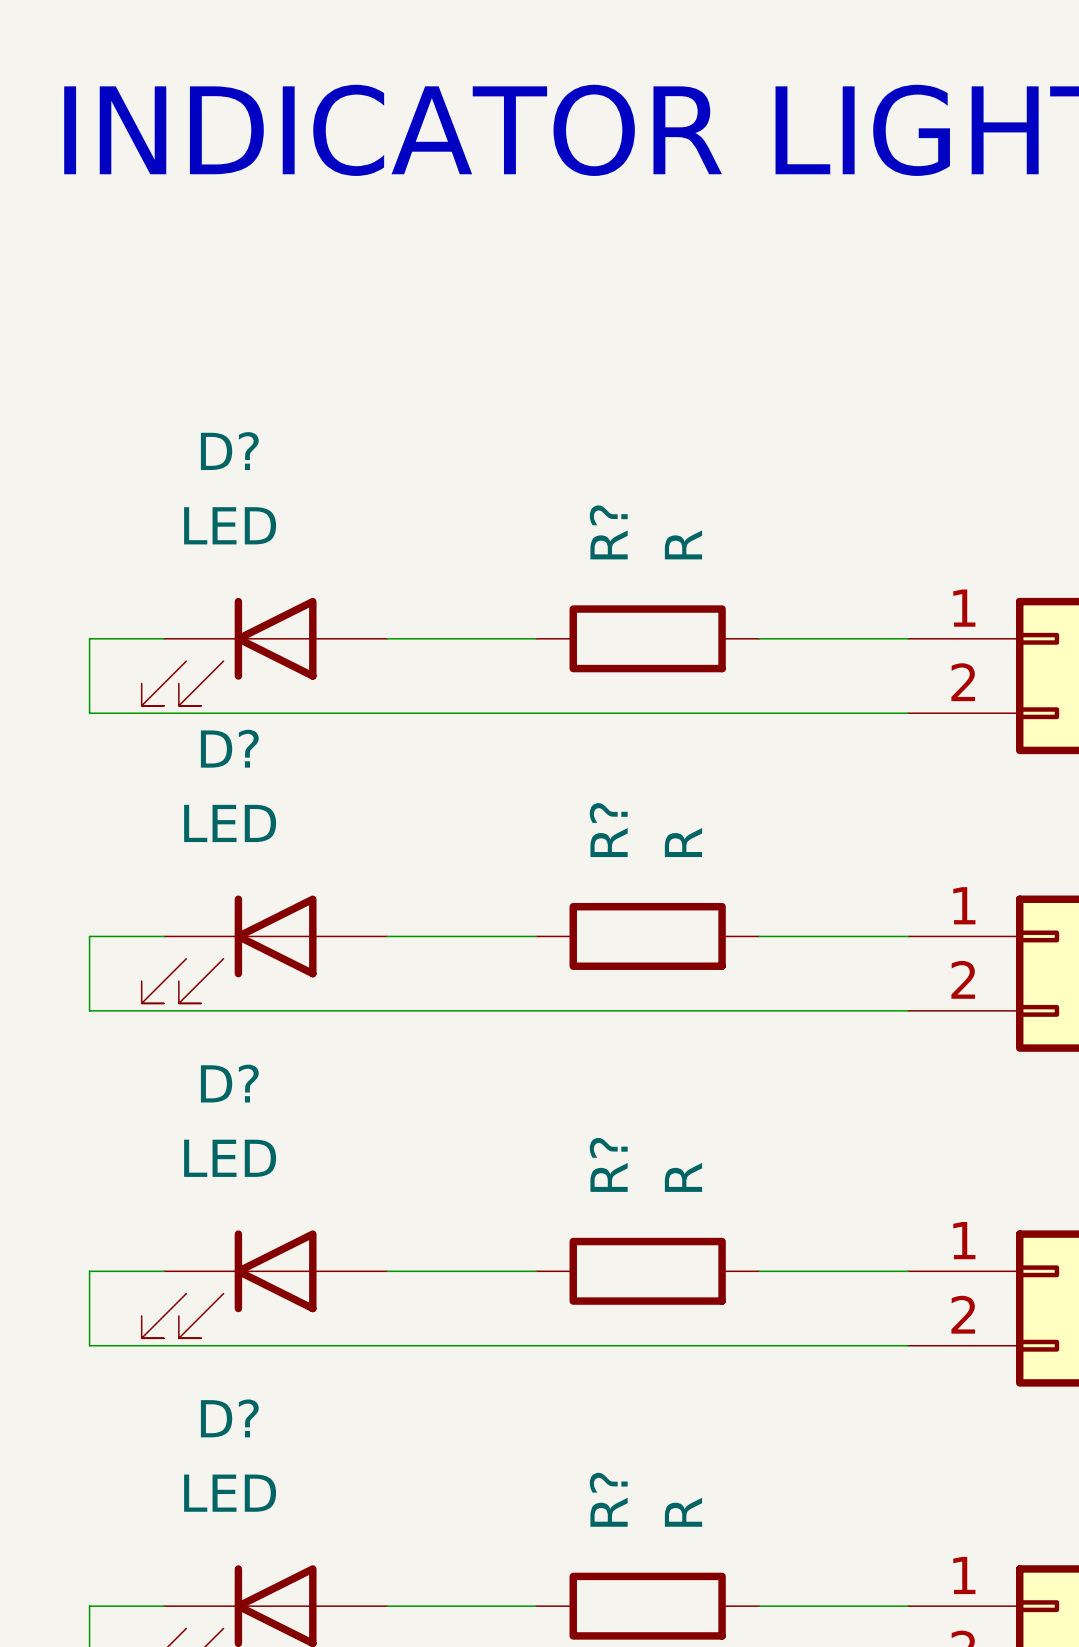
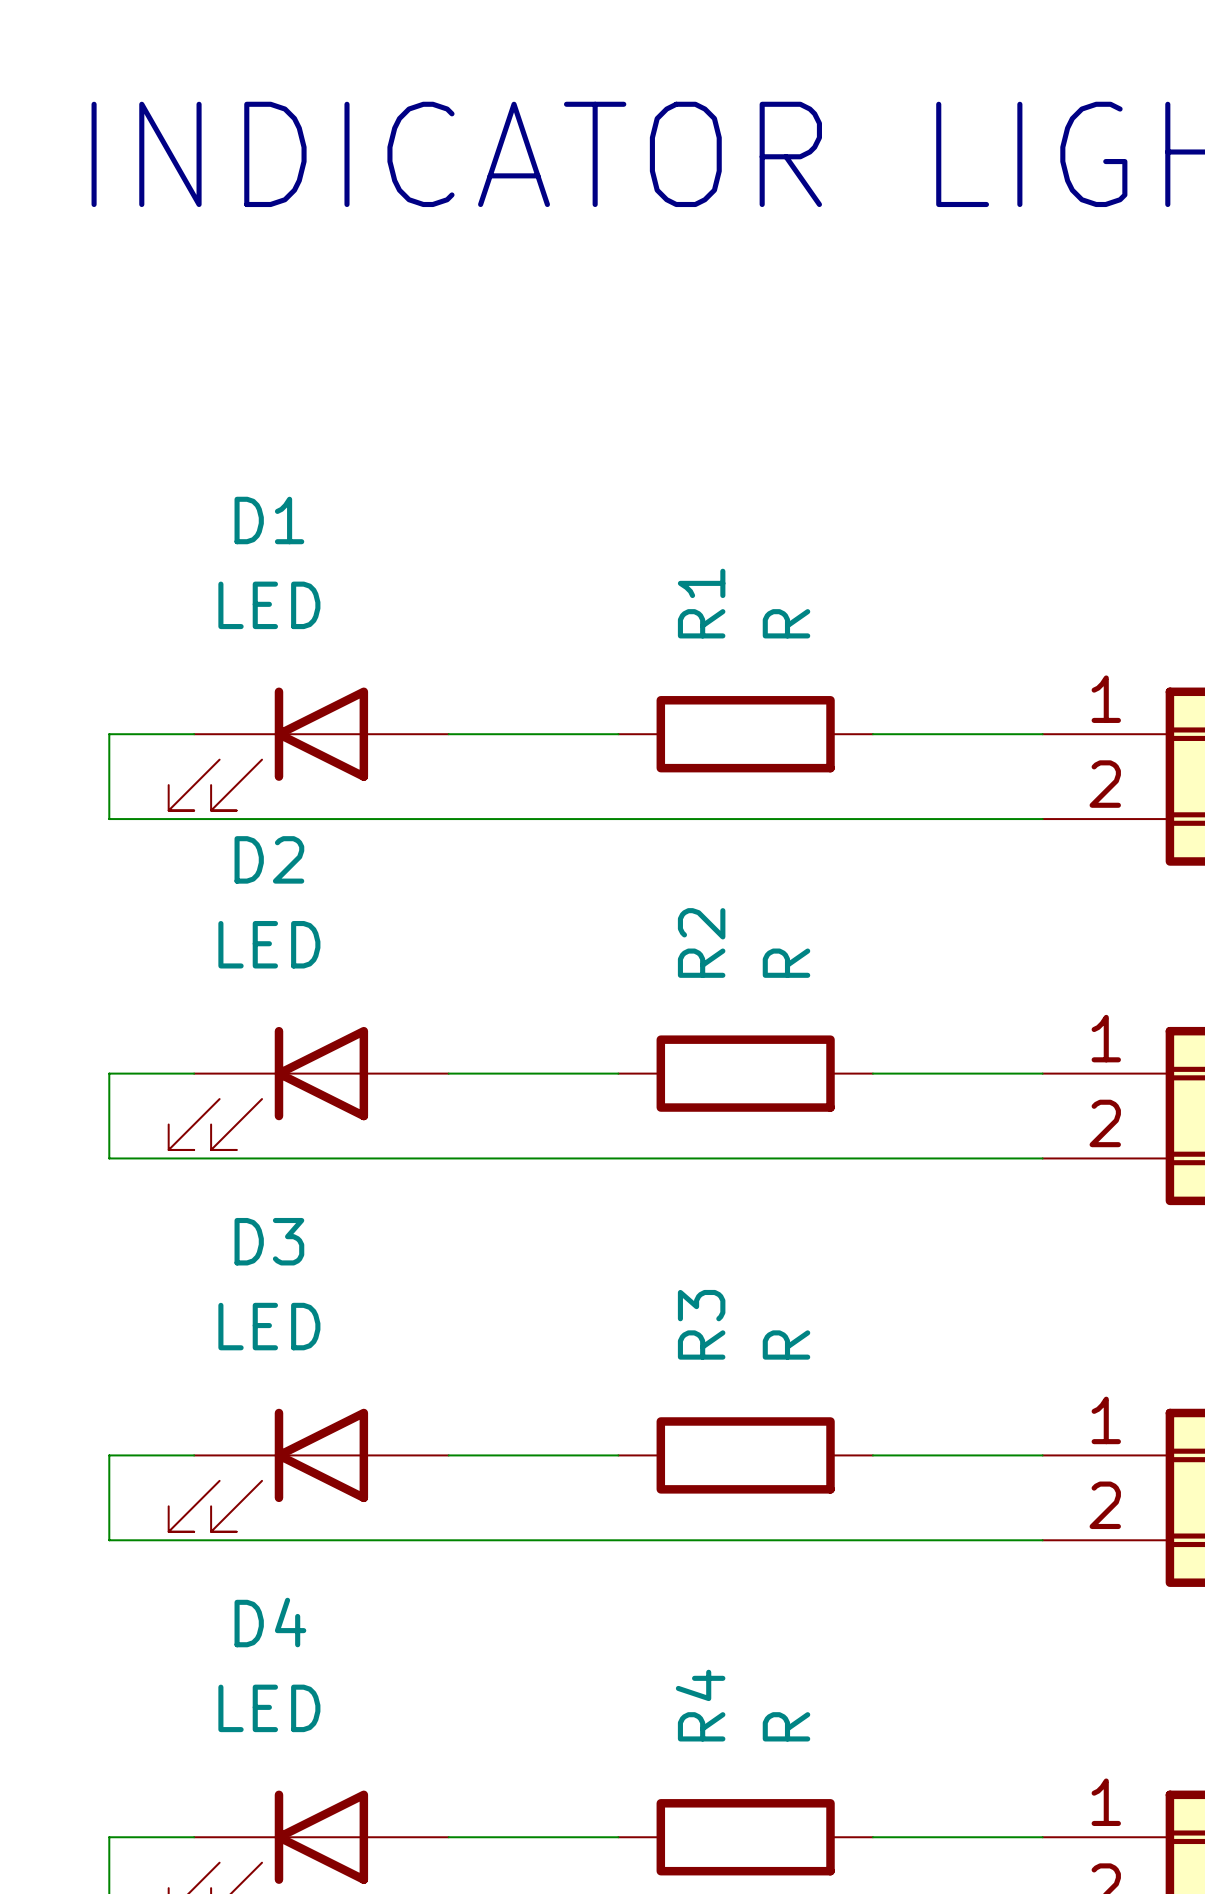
D? name: D? (229, 451) -> D1 (269, 520)
R? name: R? (608, 532) -> R1 (701, 603)
D? name: D? (229, 748) -> D2 (269, 859)
R? name: R? (608, 830) -> R2 (701, 942)
D? name: D? (229, 1083) -> D3 (269, 1241)
R? name: R? (608, 1164) -> R3 (701, 1324)
D? name: D? (229, 1418) -> D4 (270, 1622)
R? name: R? (608, 1499) -> R4 (700, 1705)

